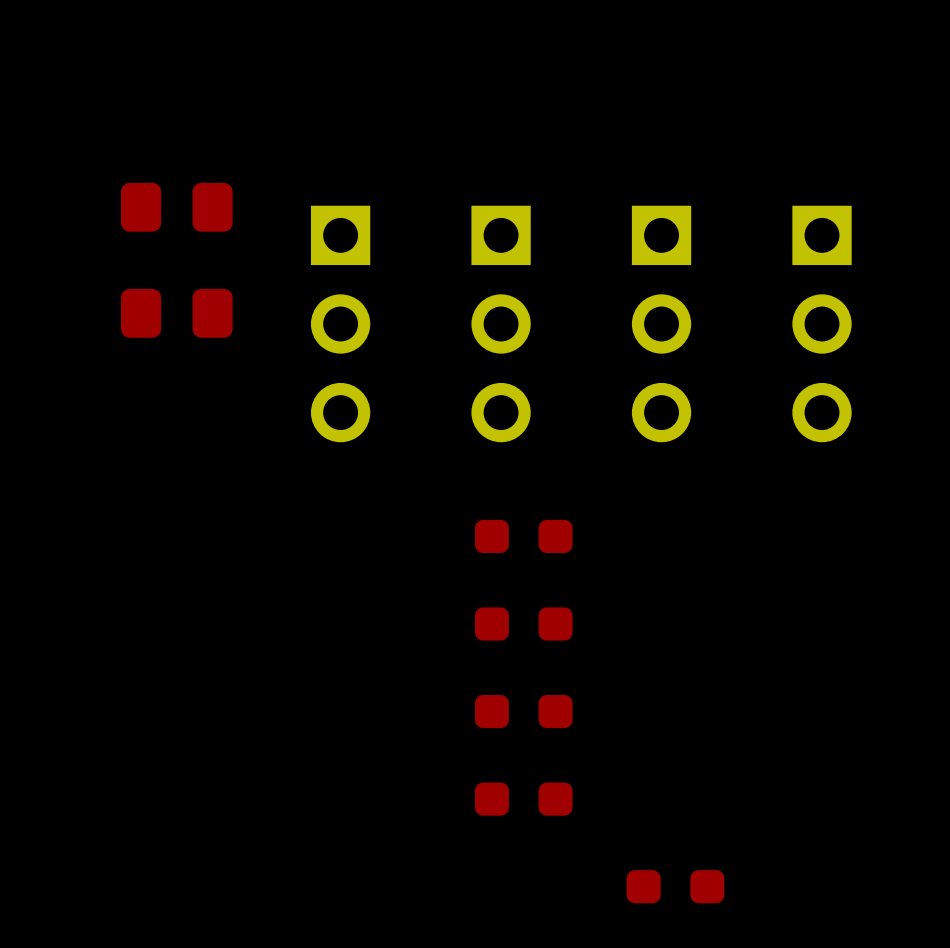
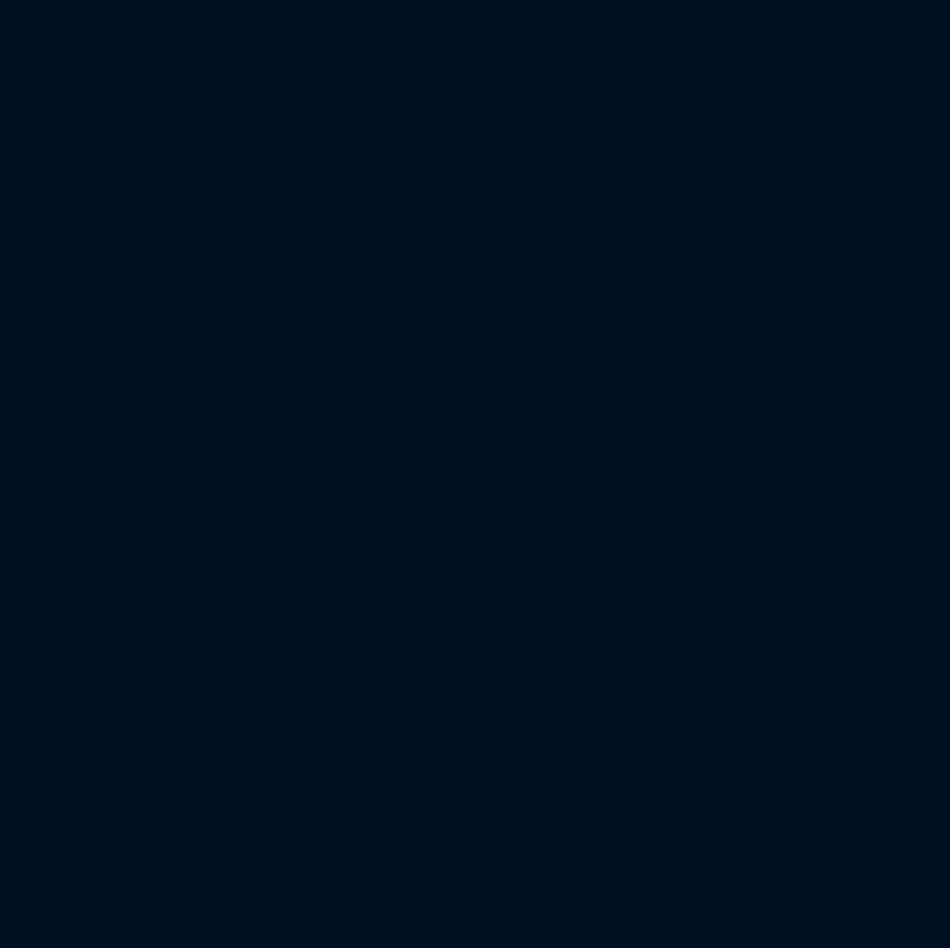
part: (176, 207) -> none
part: (176, 313) -> none
part: (340, 323) -> none
part: (501, 323) -> none
part: (661, 323) -> none
part: (822, 323) -> none
part: (523, 536) -> none
part: (523, 623) -> none
part: (523, 711) -> none
part: (523, 799) -> none
part: (675, 886) -> none

